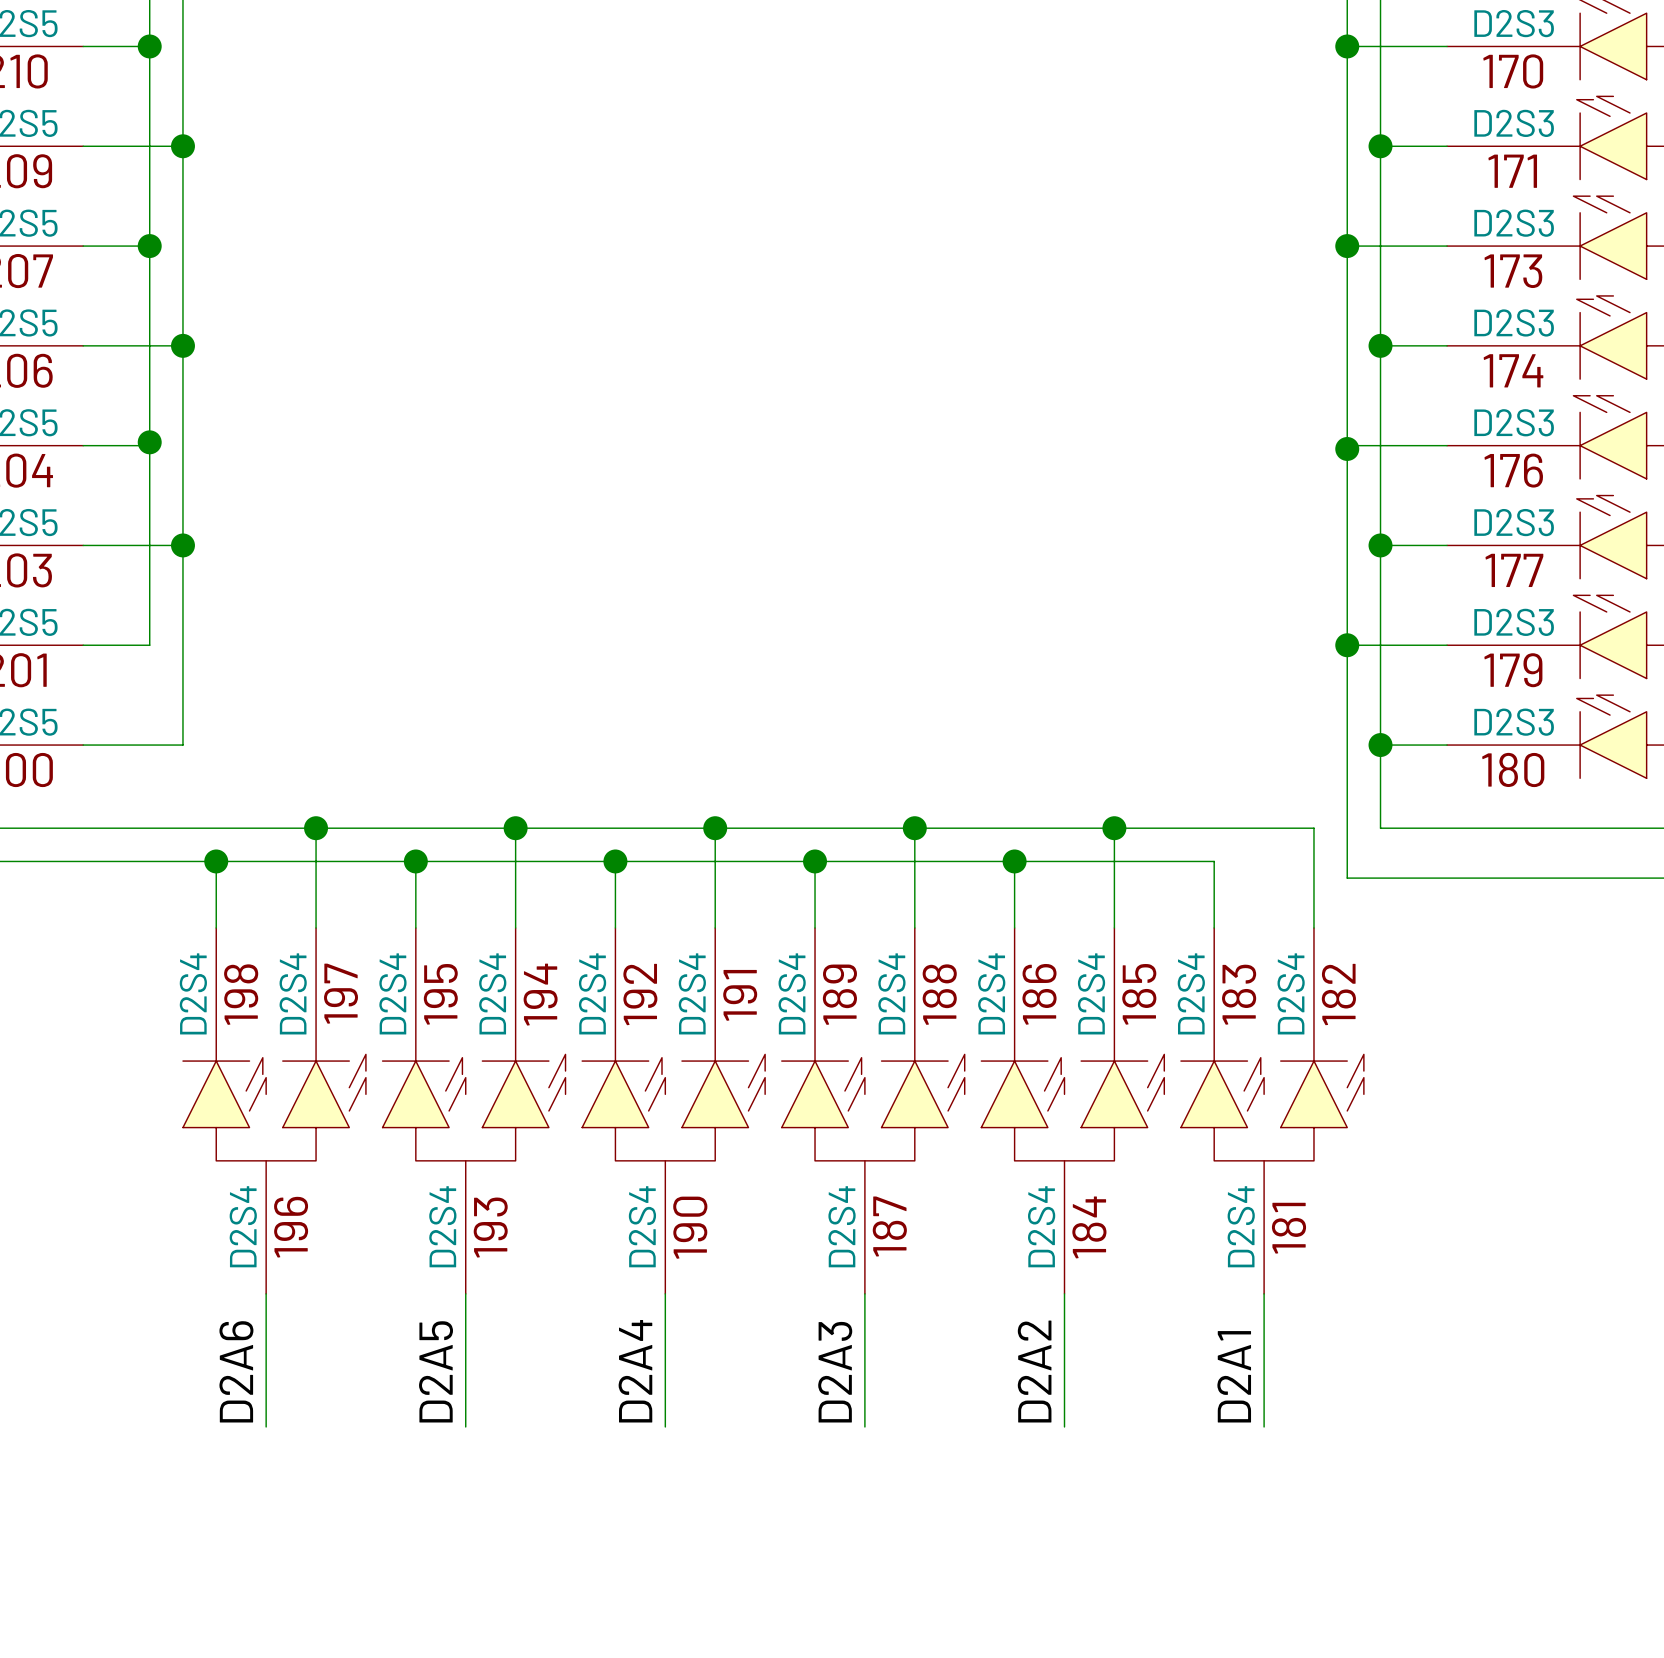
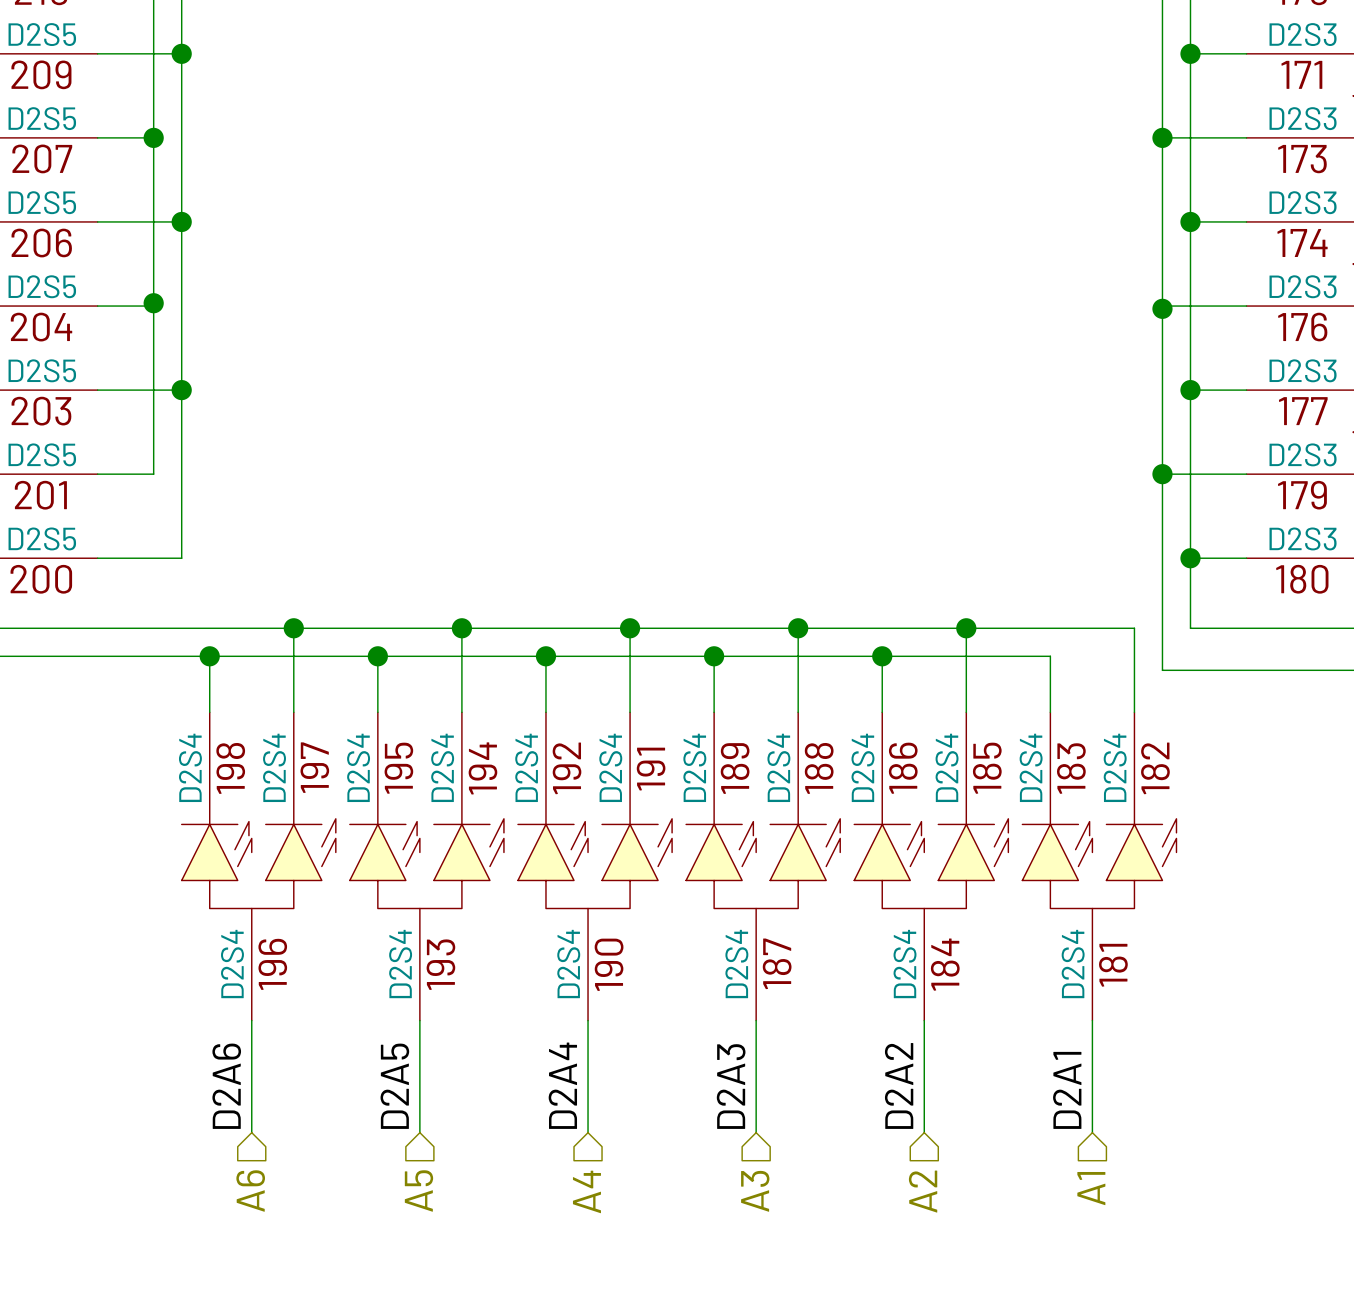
hierarchical label: none -> A1 (1091, 1188)
hierarchical label: none -> A6 (250, 1191)
hierarchical label: none -> A5 (418, 1191)
hierarchical label: none -> A3 (755, 1191)
hierarchical label: none -> A2 (923, 1191)
hierarchical label: none -> A4 (586, 1192)

